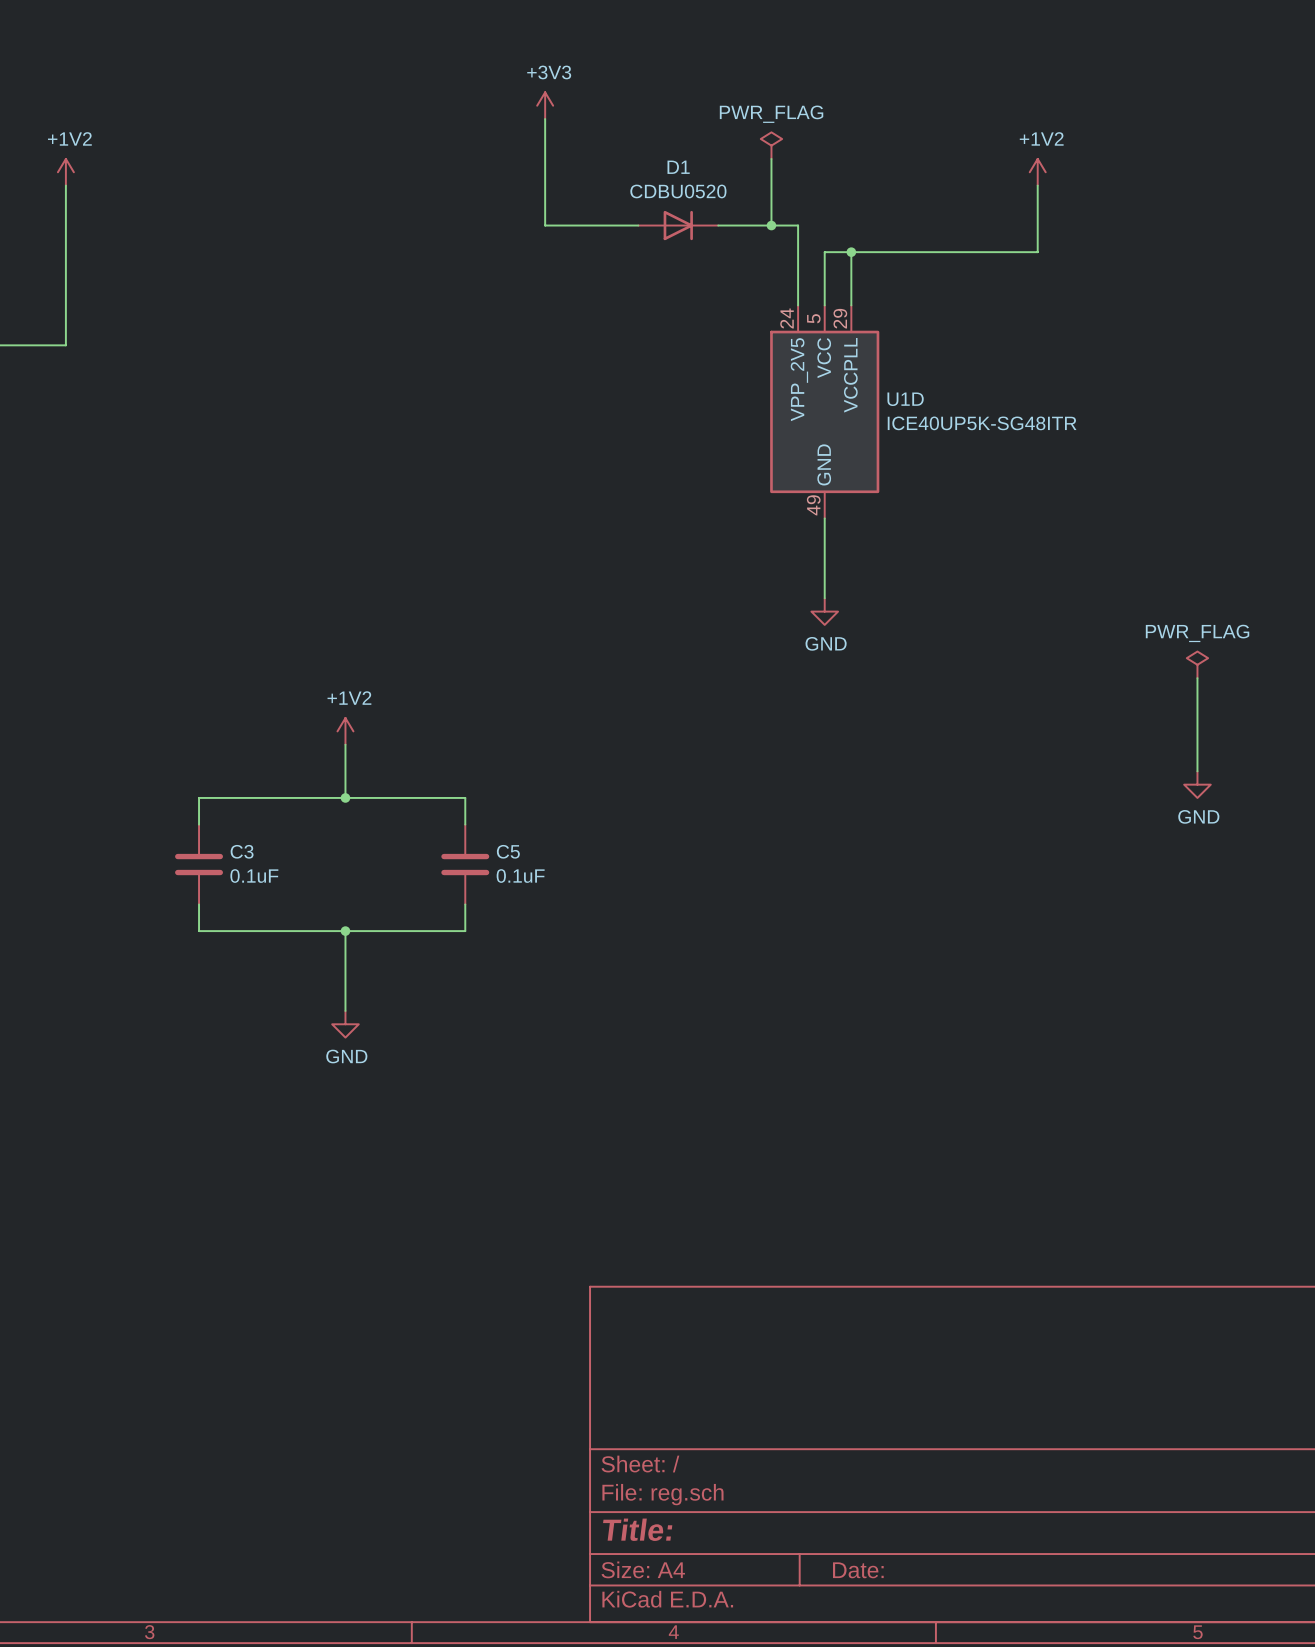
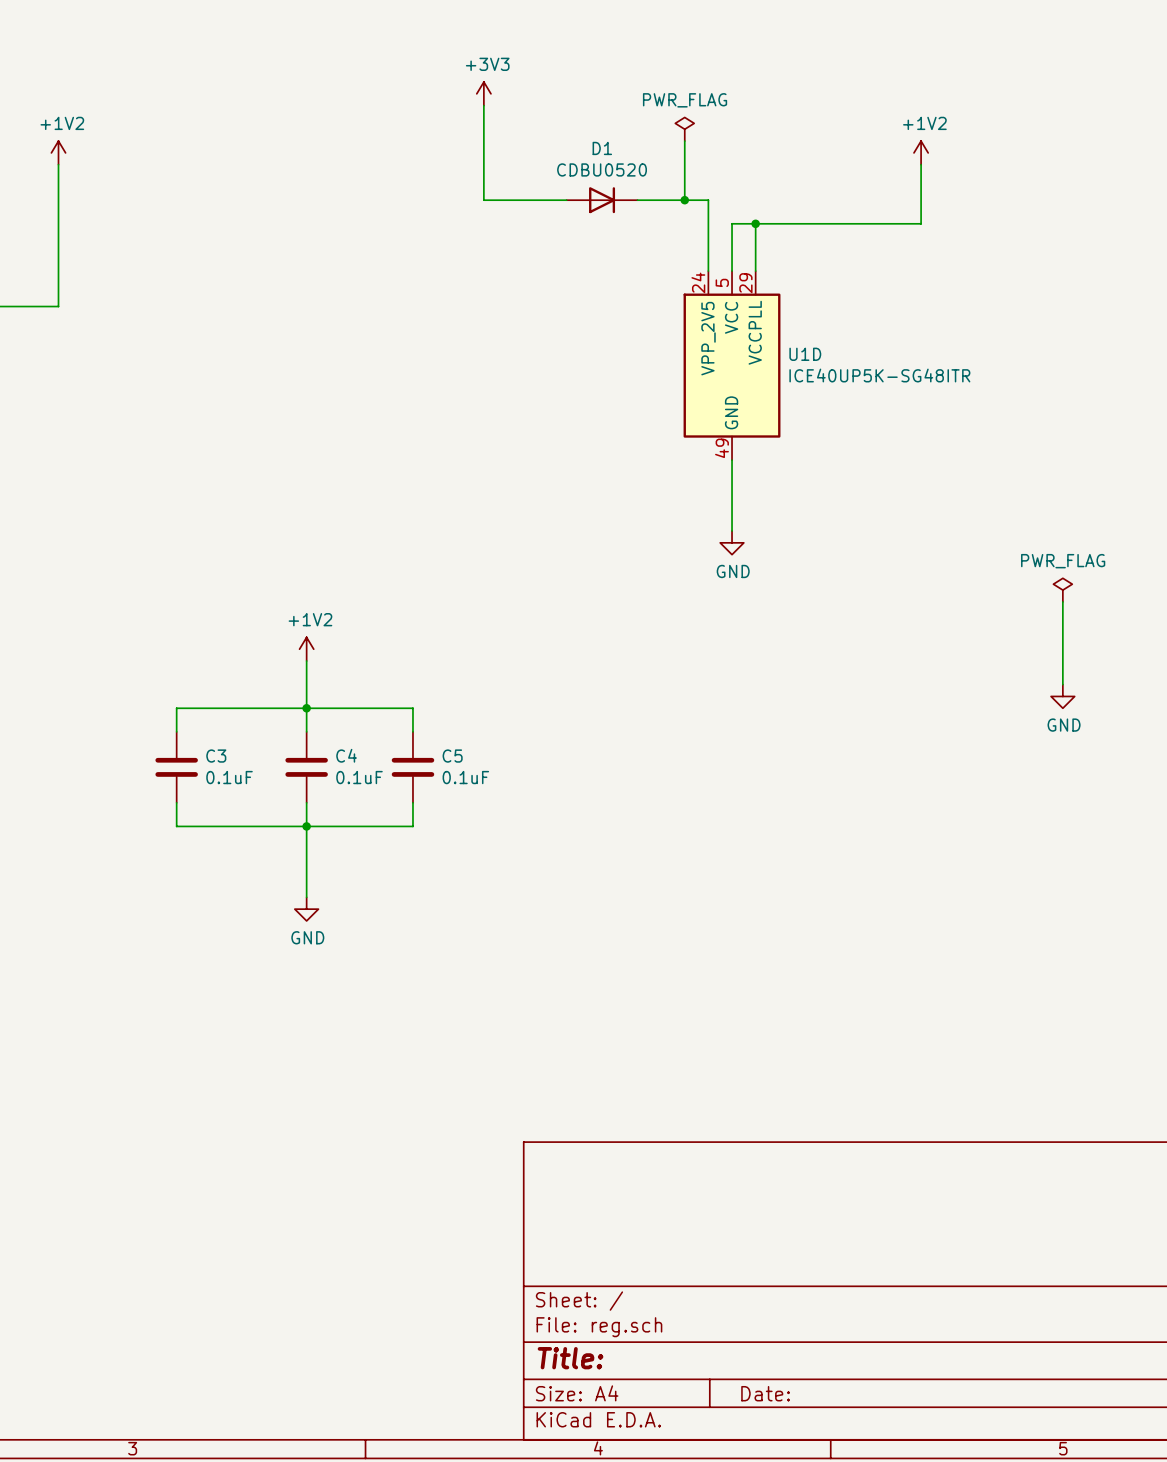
wire: none -> (306, 708) (306, 731)
C4: none -> 0.1uF (306, 767)
wire: none -> (306, 802) (306, 826)

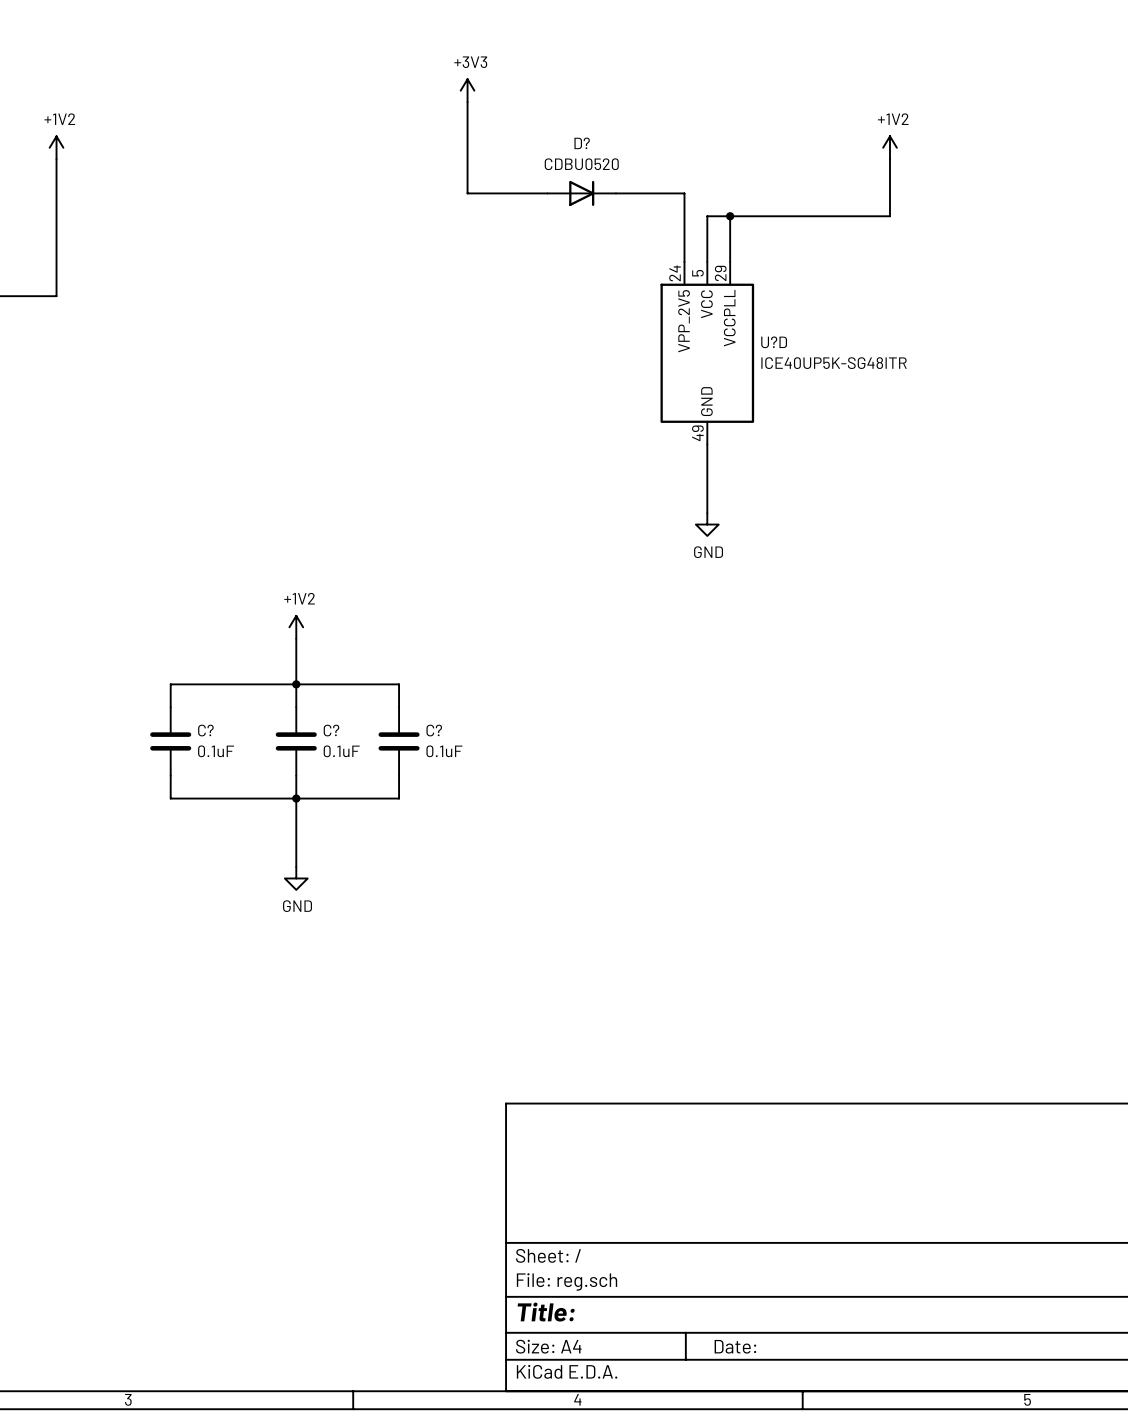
power symbol: PWR_FLAG (684, 129) -> none
wire: (684, 141) (684, 200) -> none
D1 name: D1 (602, 148) -> D? (582, 143)
junction: (684, 200) -> none
U1D name: U1D (805, 354) -> U?D (774, 342)
power symbol: PWR_FLAG (1062, 590) -> none
wire: (1062, 601) (1062, 684) -> none
power symbol: GND (1062, 696) -> none
C4 name: C4 (346, 755) -> C? (331, 730)
C3 name: C3 (216, 756) -> C? (205, 730)
C5 name: C5 (452, 756) -> C? (434, 730)

